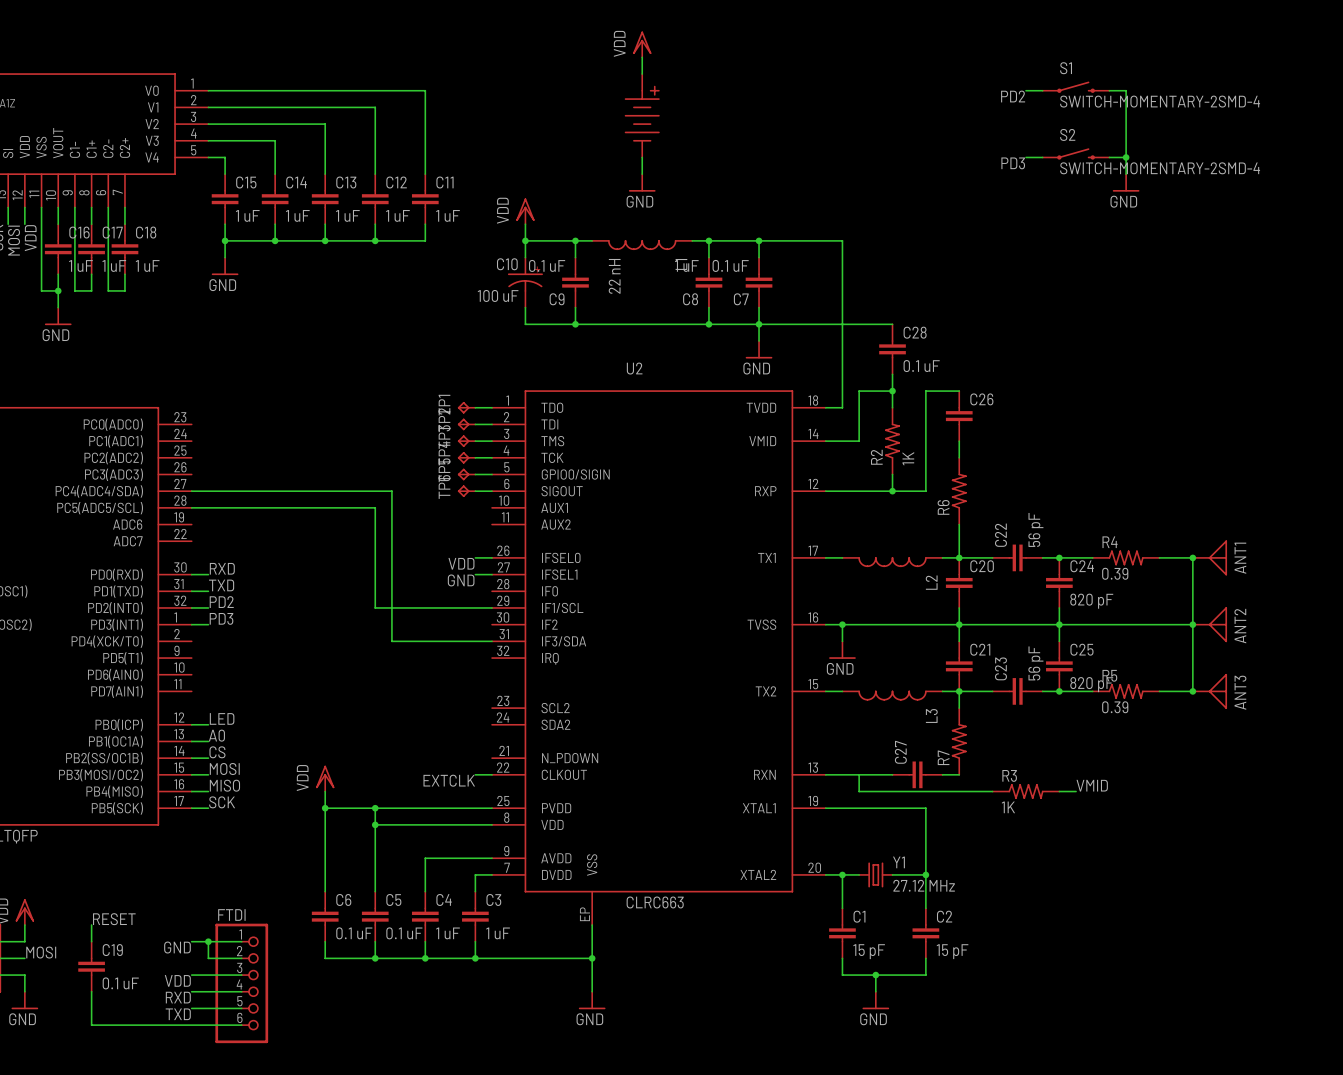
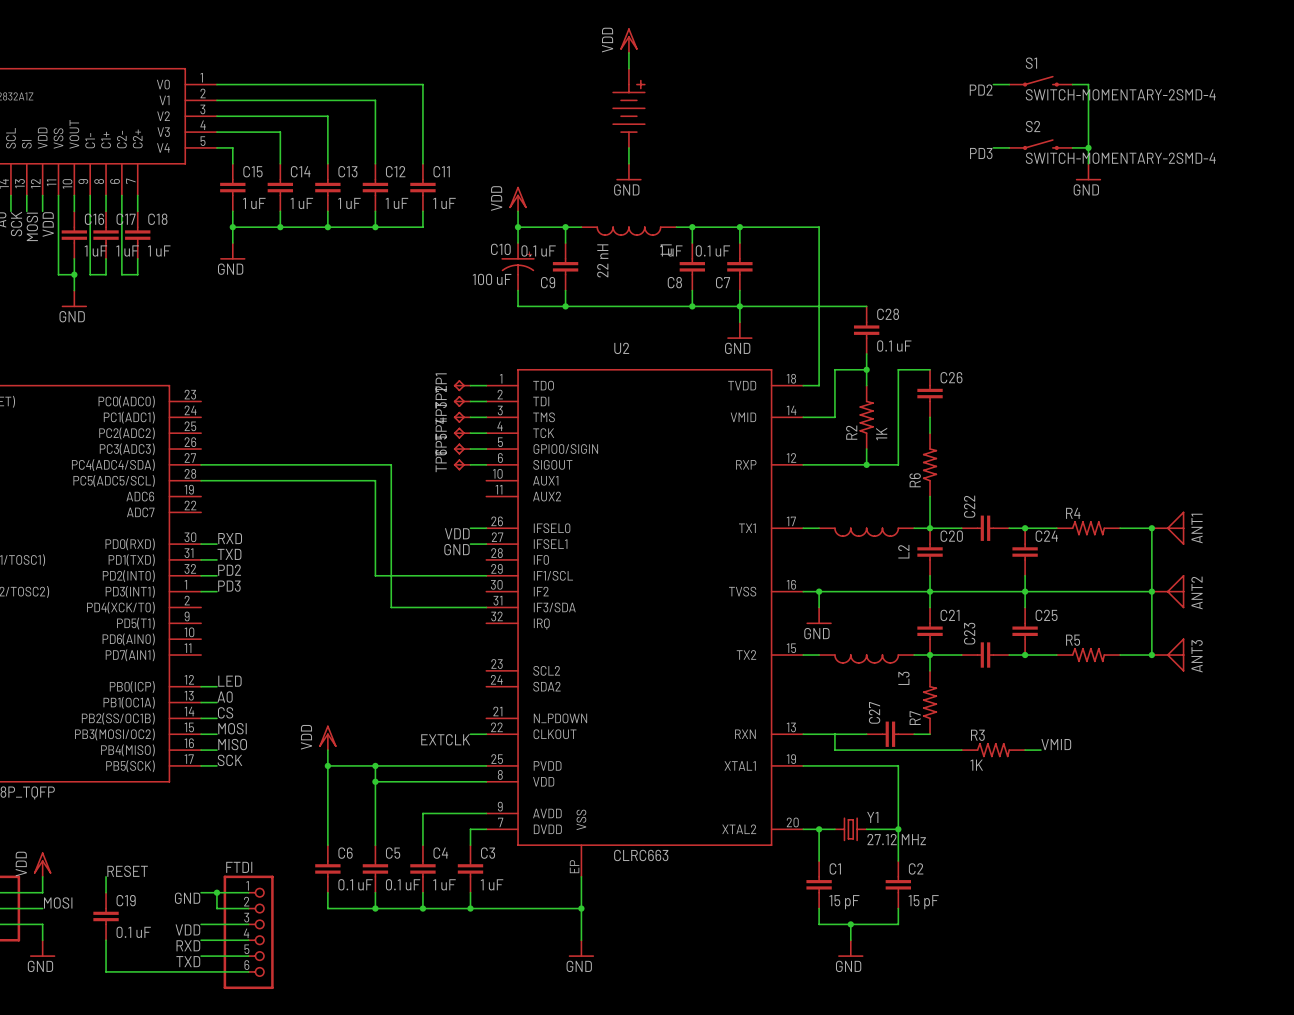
C22 value: 56 pF (1035, 529) -> none
R4 value: 0.39 (1115, 573) -> none
C24 value: 820 pF (1091, 601) -> none
C23 value: 56 pF (1035, 663) -> none
C25 value: 820 pF (1091, 684) -> none
R5 value: 0.39 (1115, 707) -> none

